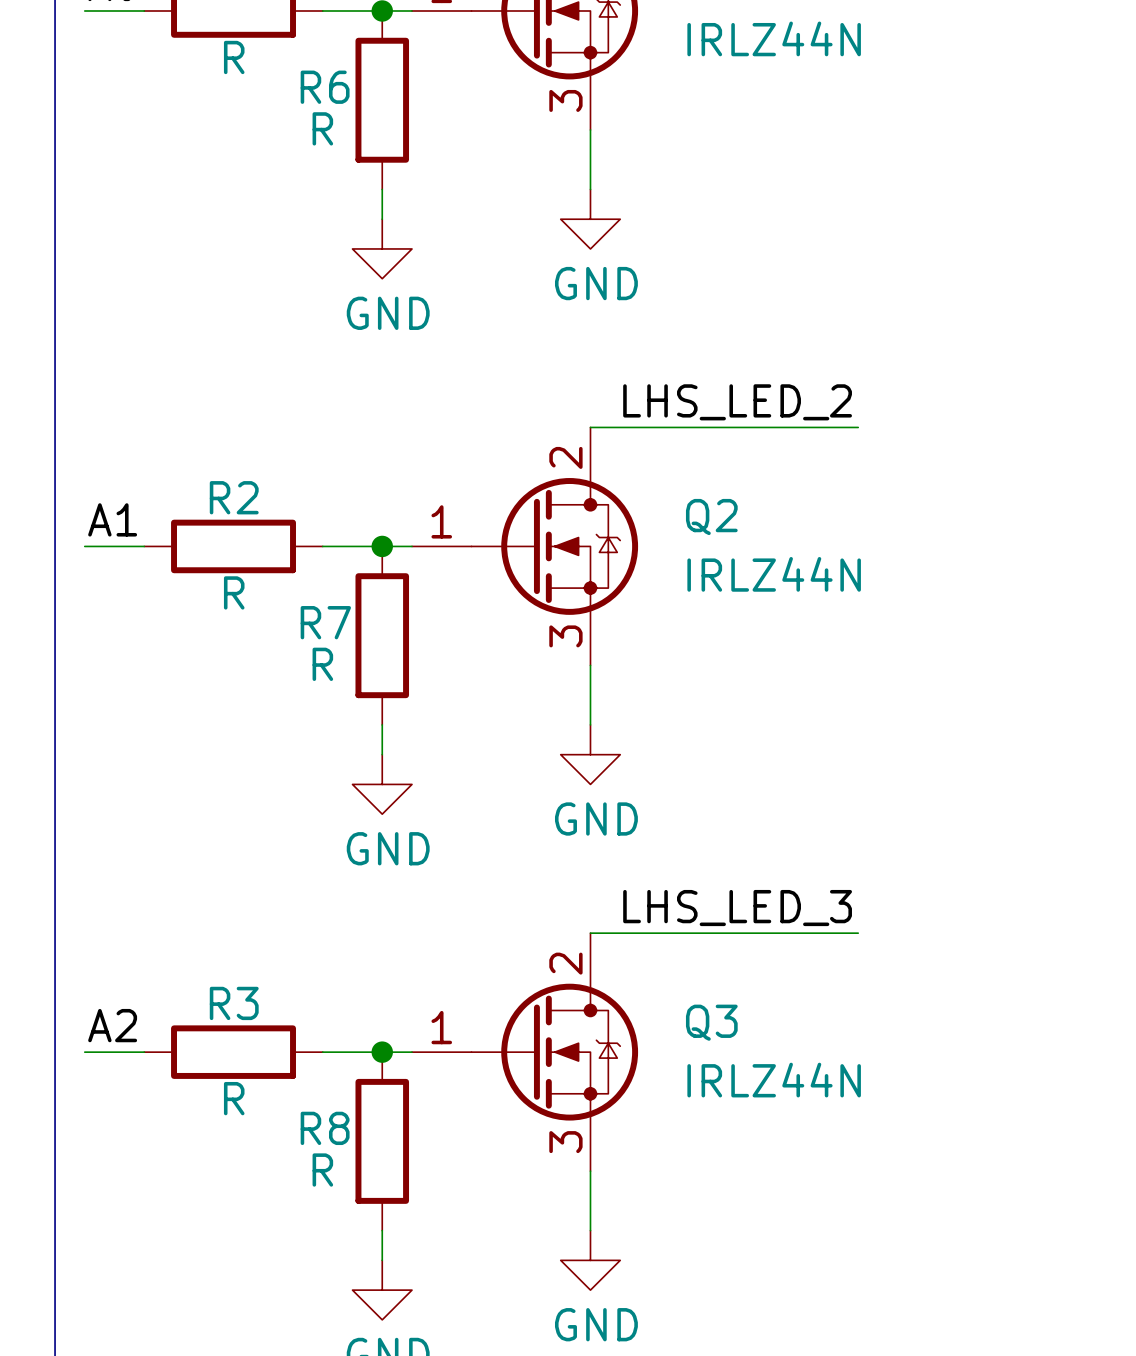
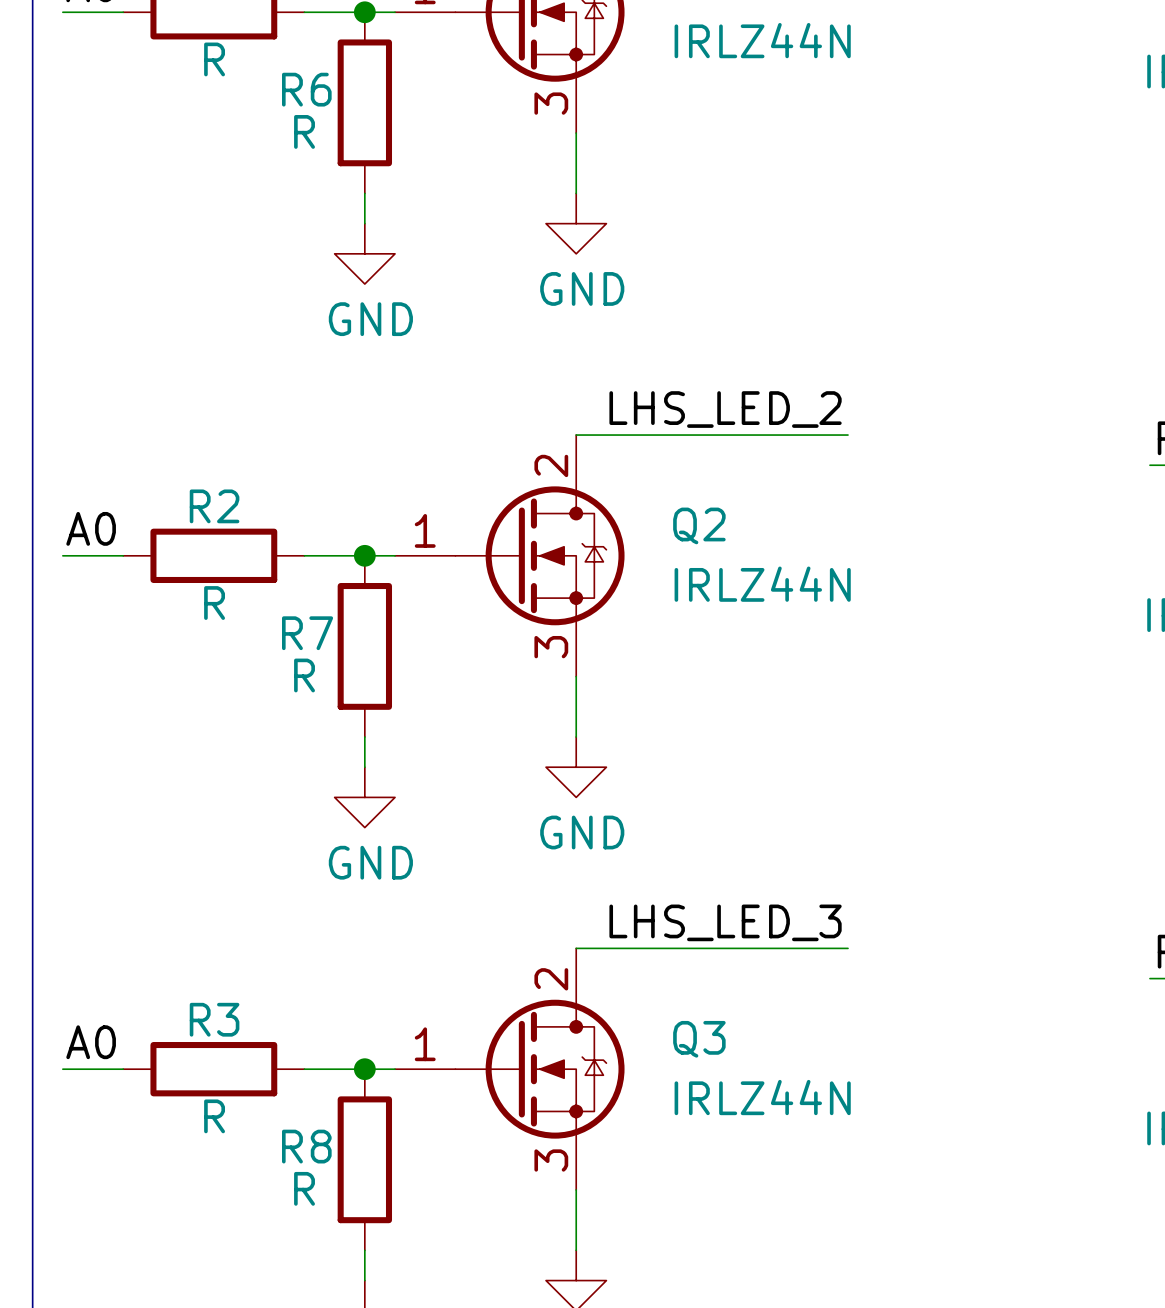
label: A1 (112, 519) -> A0 (91, 528)
label: A2 (112, 1025) -> A0 (91, 1042)

